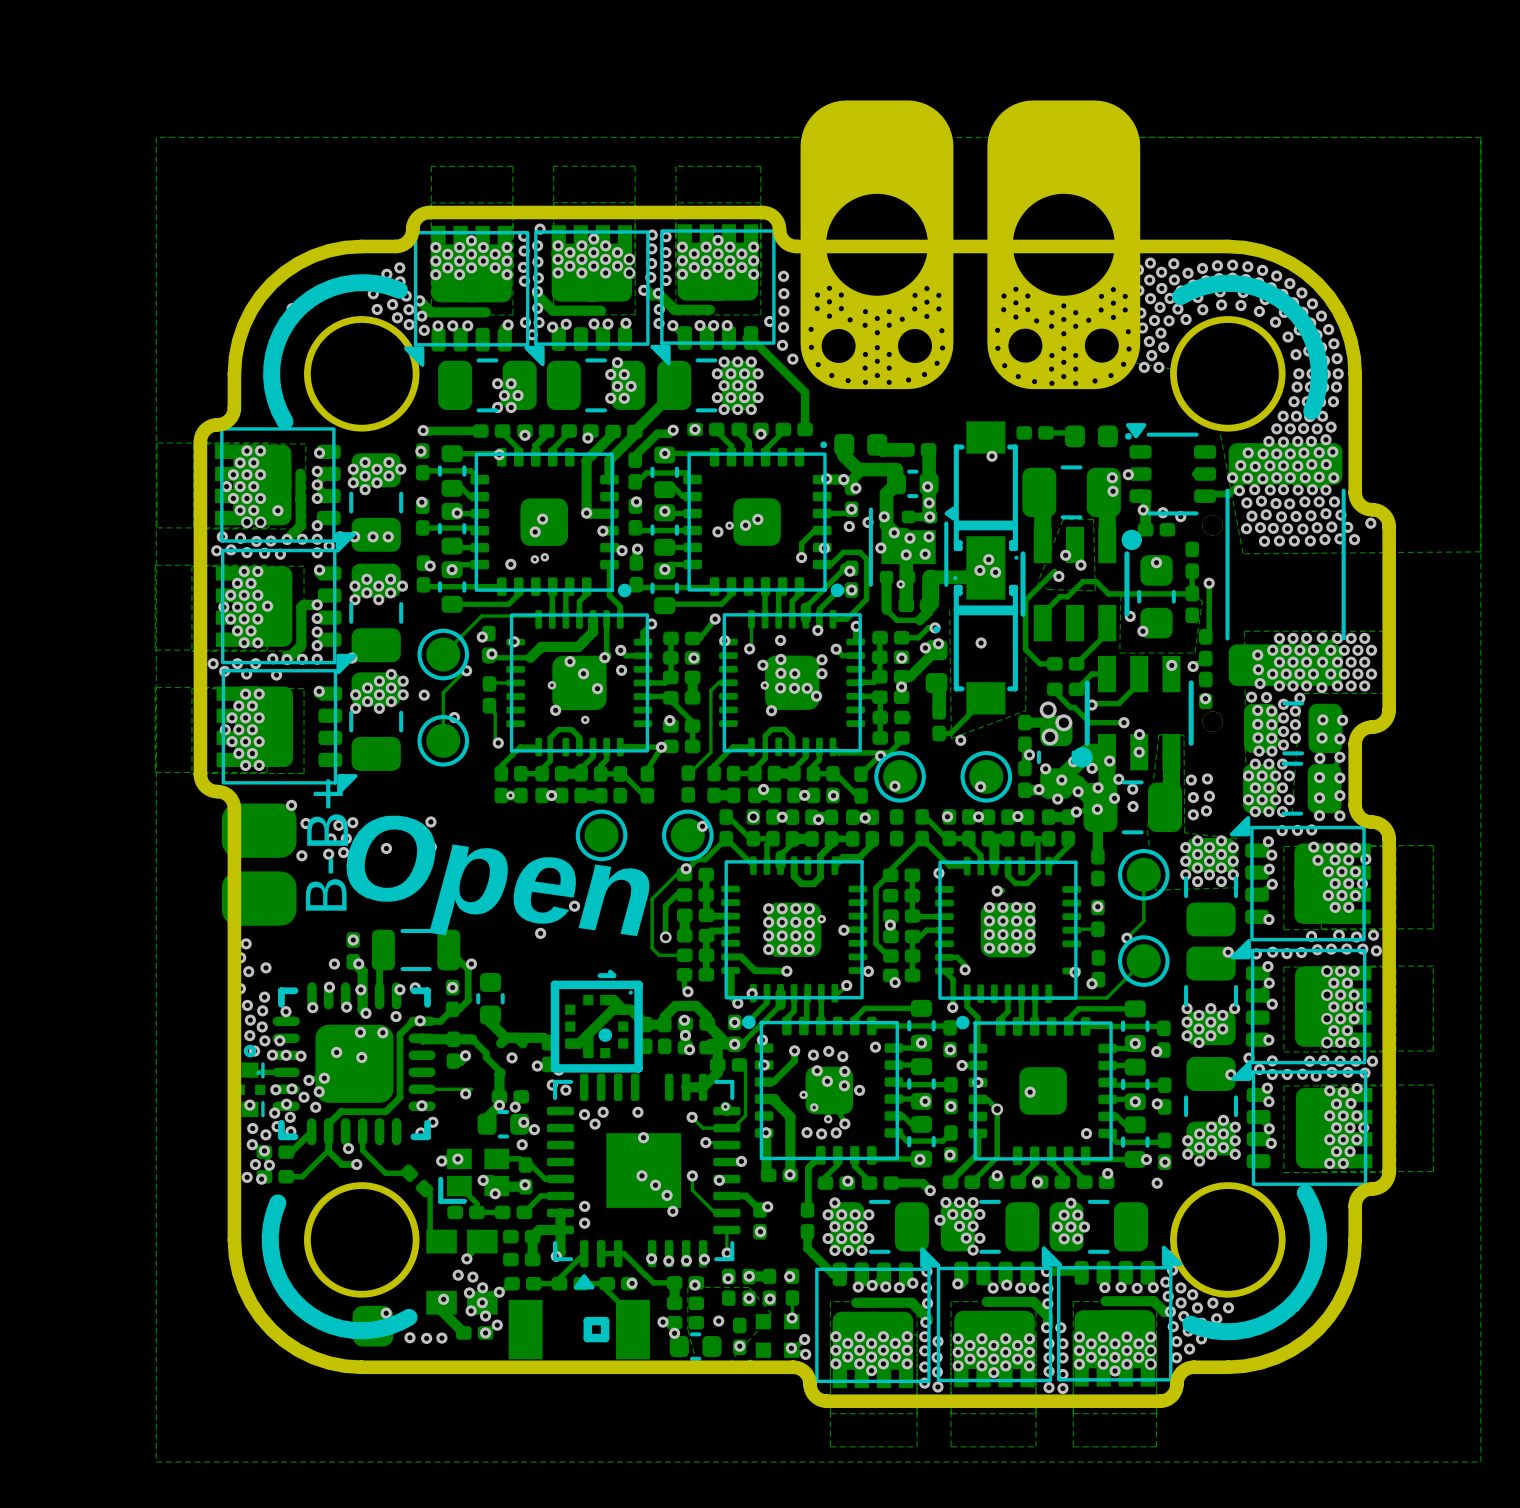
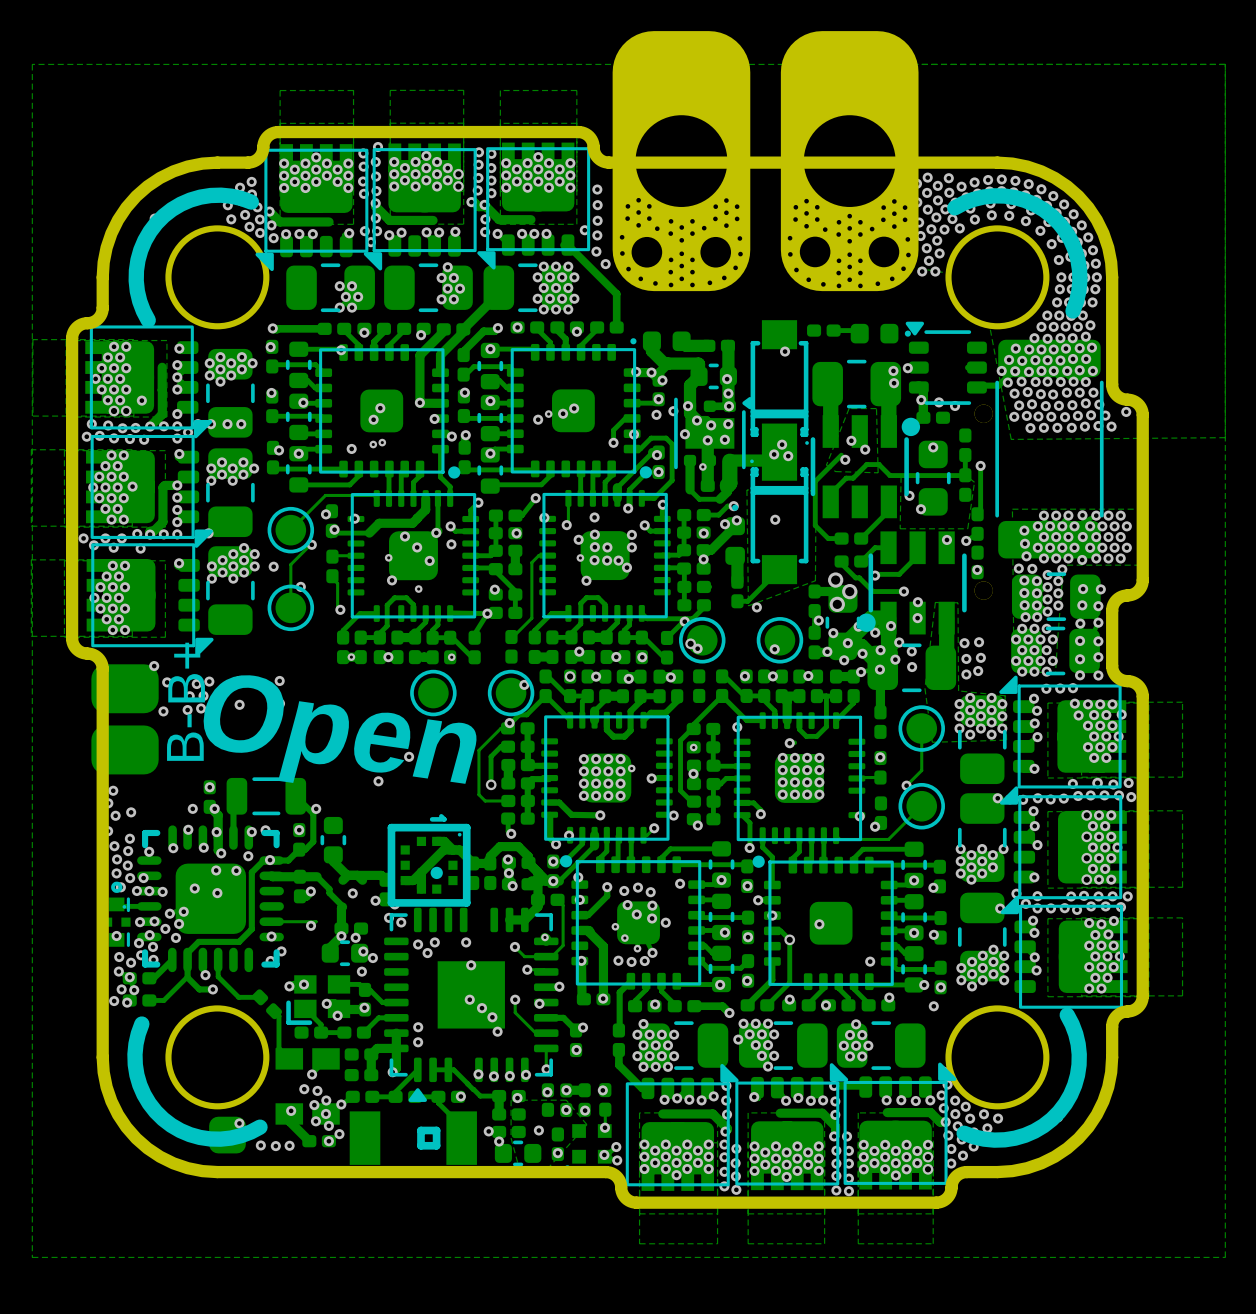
via: none -> (690, 643)
via: none -> (451, 657)
via: none -> (693, 747)

